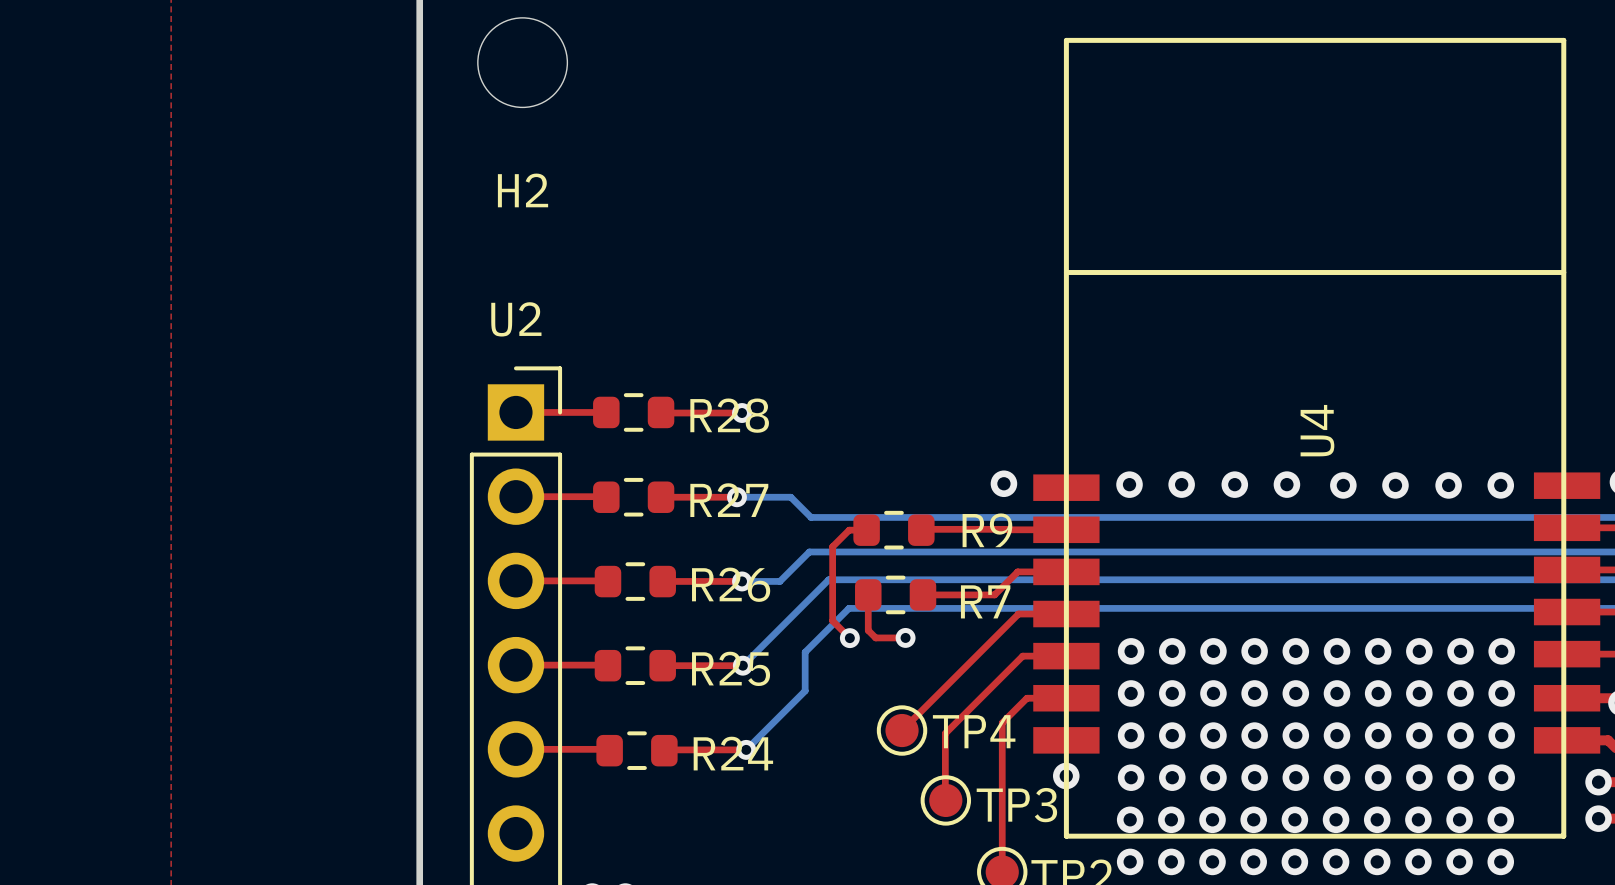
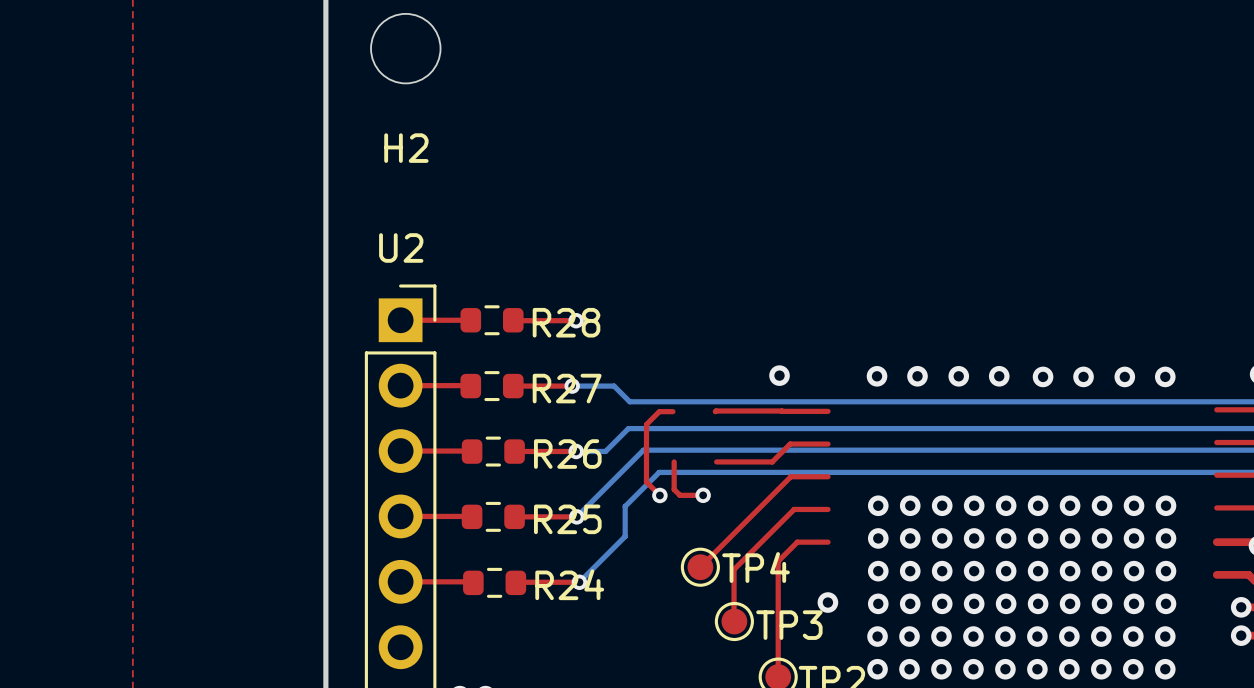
U4: (1316, 438) -> none
R9: (893, 530) -> none
R7: (895, 594) -> none

